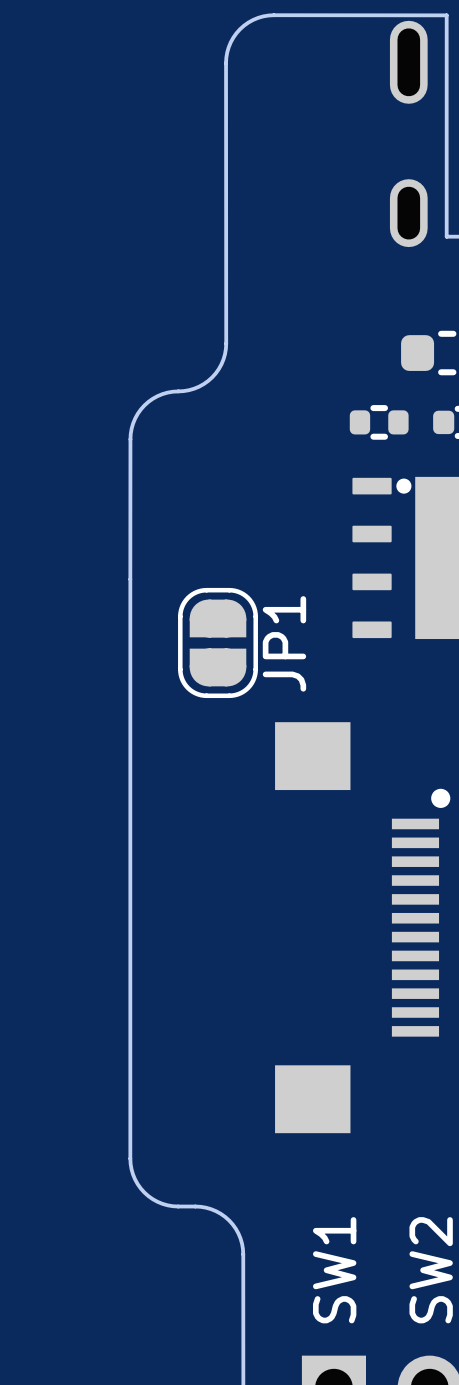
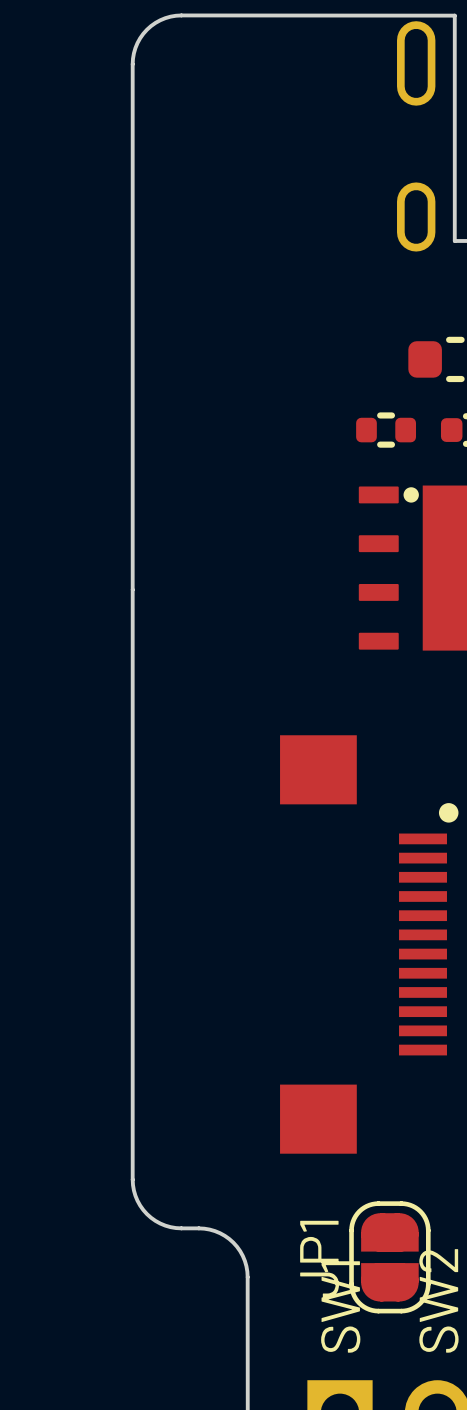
board edge: (446, 15) (268, 15) (248, 22) (233, 37) (227, 52) (226, 63) (225, 354) (218, 368) (208, 380) (194, 388) (157, 396) (144, 405) (135, 418) (130, 439) (130, 579) -> (454, 15) (175, 15) (155, 22) (140, 38) (133, 53) (132, 64) (132, 589)
JP1 position: (218, 642) -> (389, 1257)
JP1 name position: JP1 (284, 643) -> JP1 (319, 1259)

